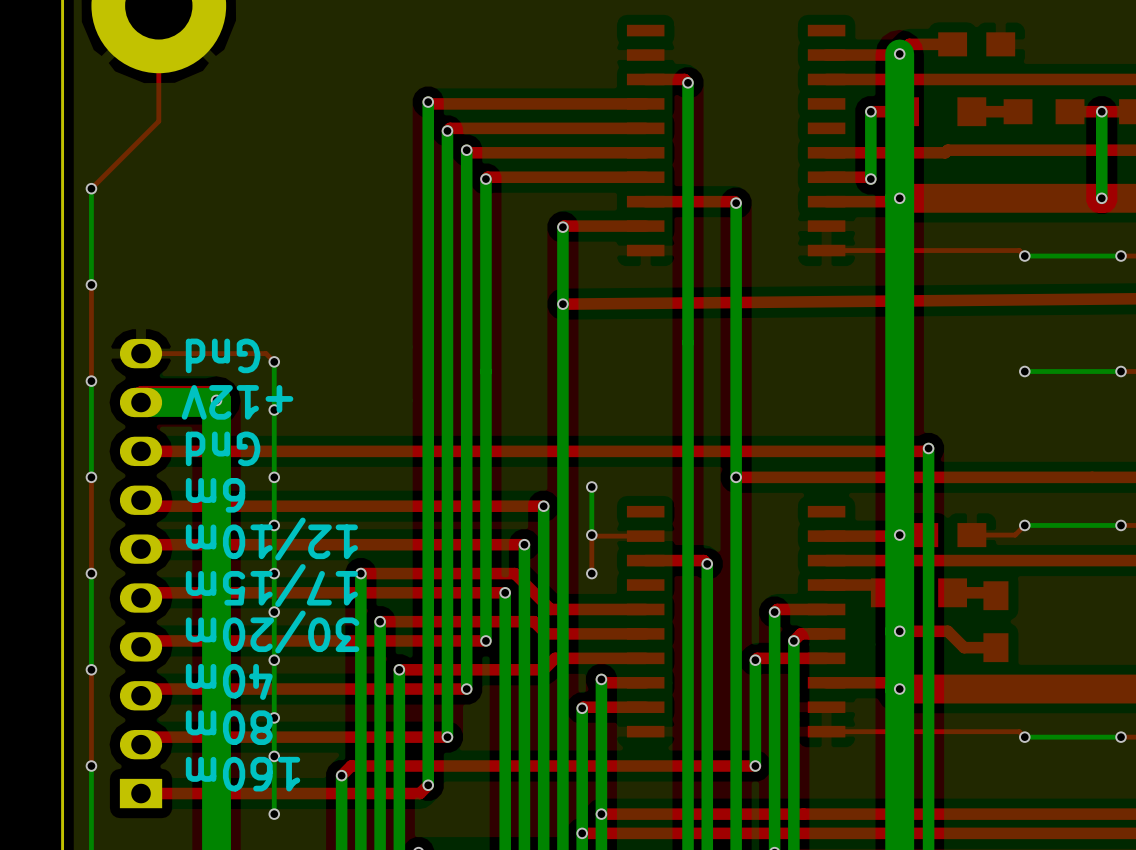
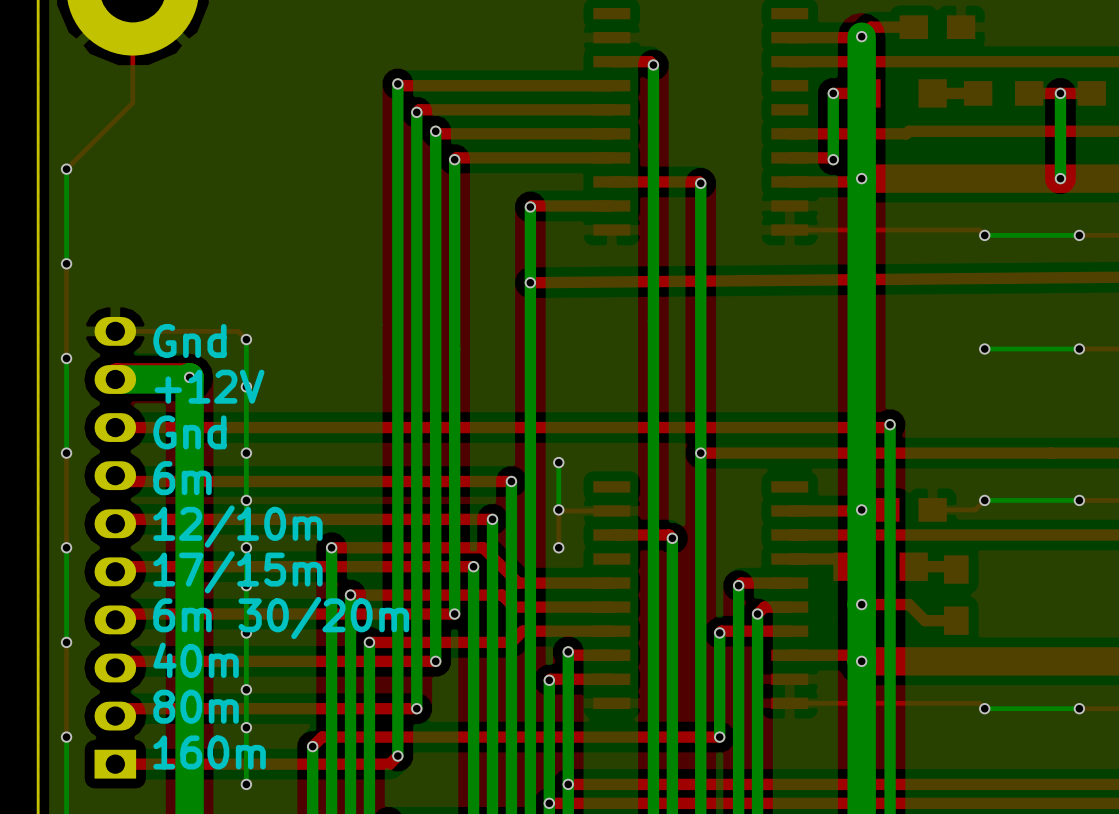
text rotation: 0° (223, 355) -> 180° (189, 340)
text rotation: 0° (237, 402) -> 180° (209, 386)
text rotation: 0° (223, 448) -> 180° (189, 432)
text rotation: 0° (215, 495) -> 180° (182, 478)
text rotation: 0° (271, 539) -> 180° (237, 526)
text rotation: 0° (271, 585) -> 180° (237, 572)
text: 30/20m (272, 631) -> 6m 30/20m (281, 618)
text rotation: 0° (229, 681) -> 180° (196, 660)
text rotation: 0° (229, 727) -> 180° (196, 706)
text rotation: 0° (243, 774) -> 180° (209, 752)

